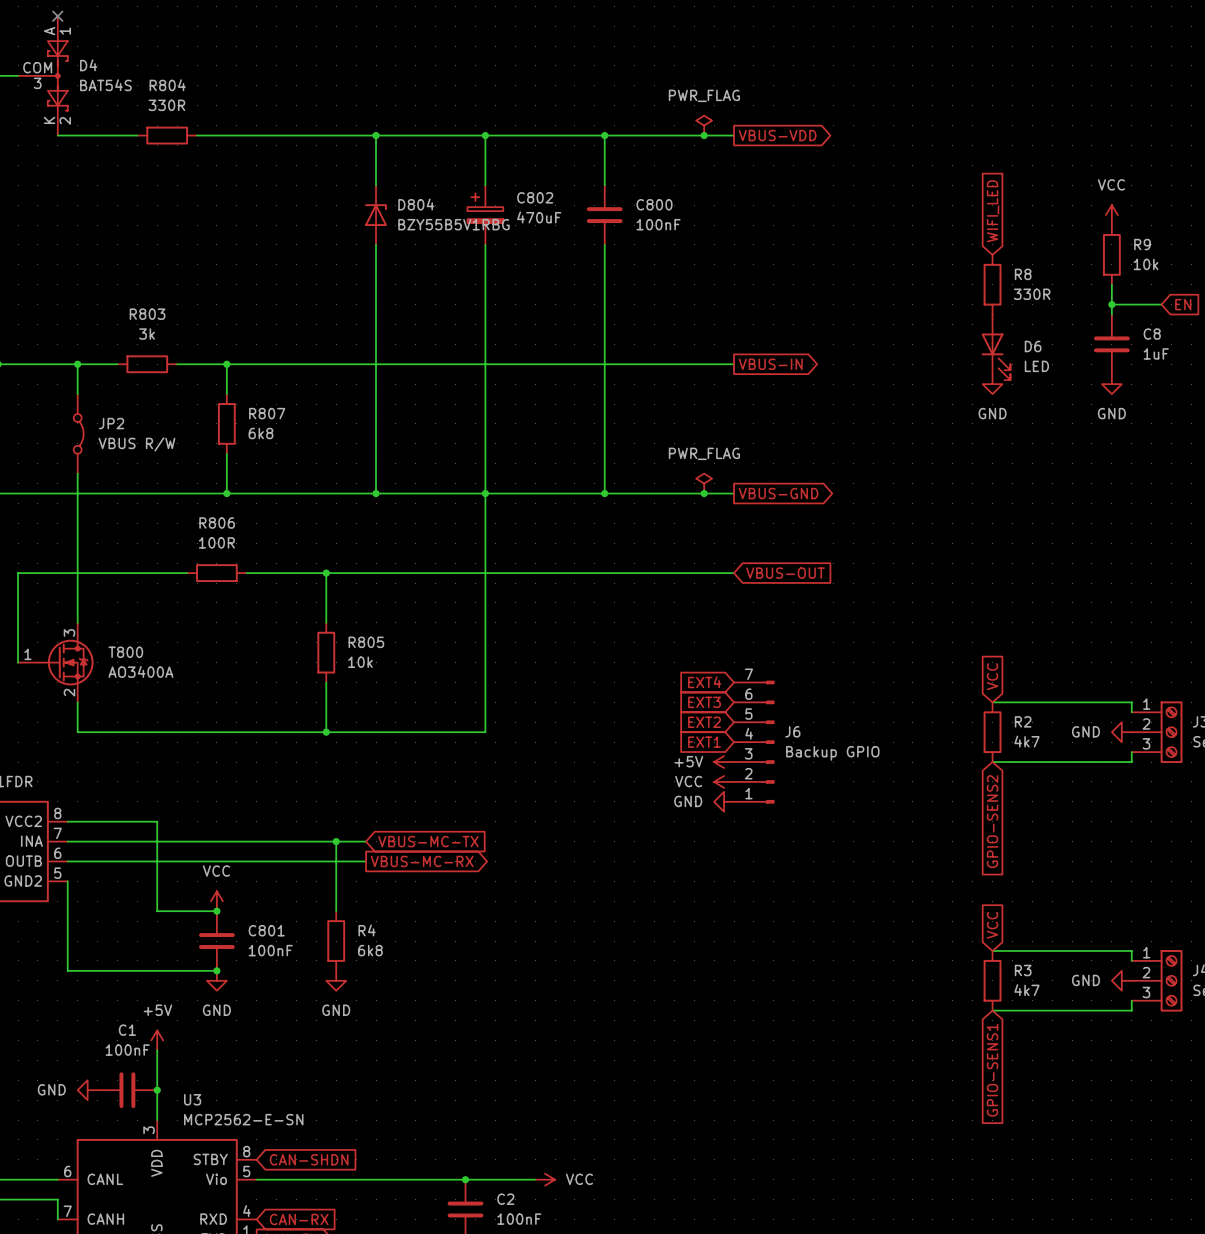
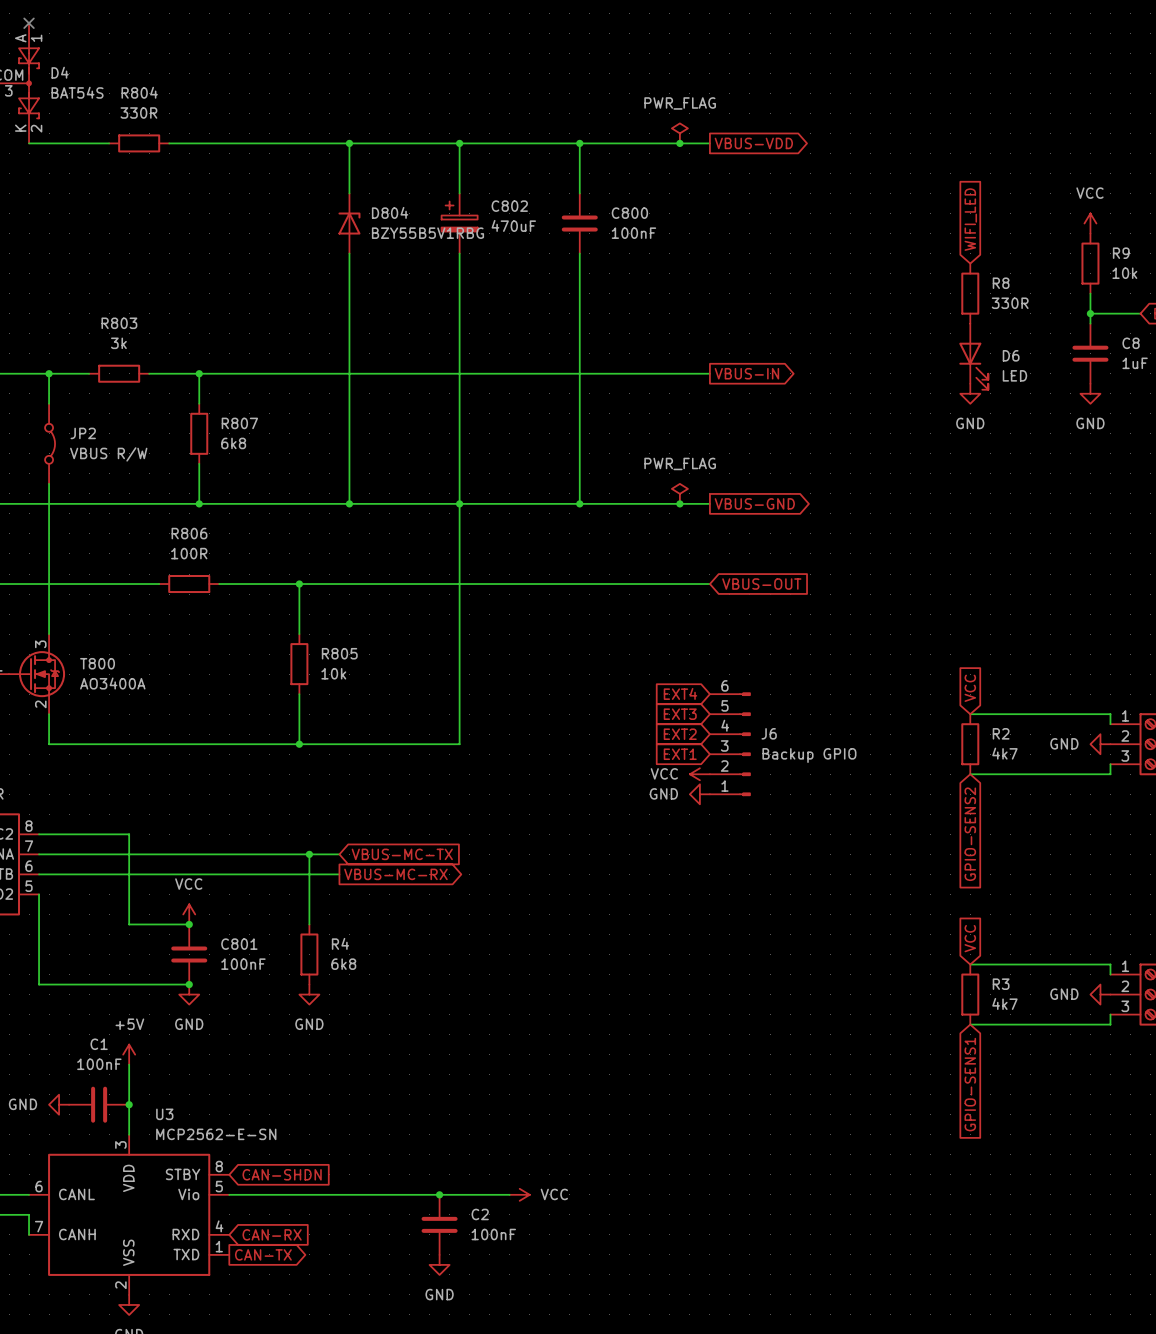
J6 symbol: [734, 680, 775, 804] -> [709, 692, 751, 796]
power symbol: +5V (724, 762) -> VCC (699, 774)
power symbol: VCC (724, 781) -> GND (699, 794)
power symbol: GND (724, 801) -> none

